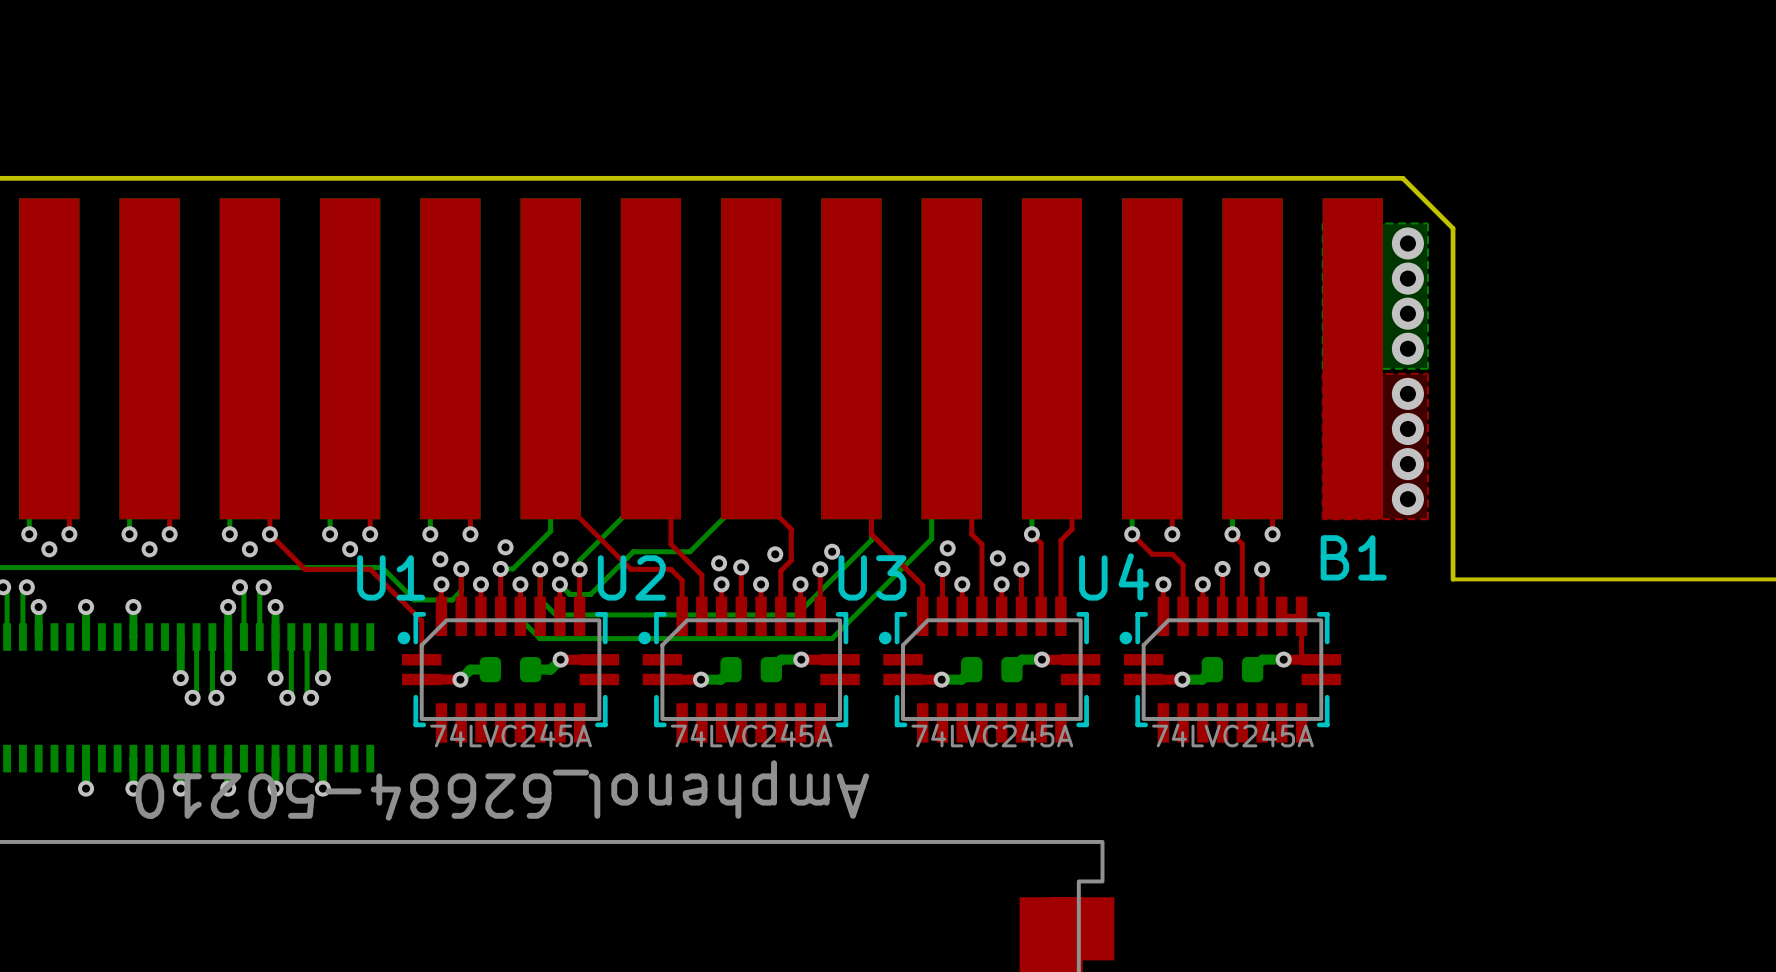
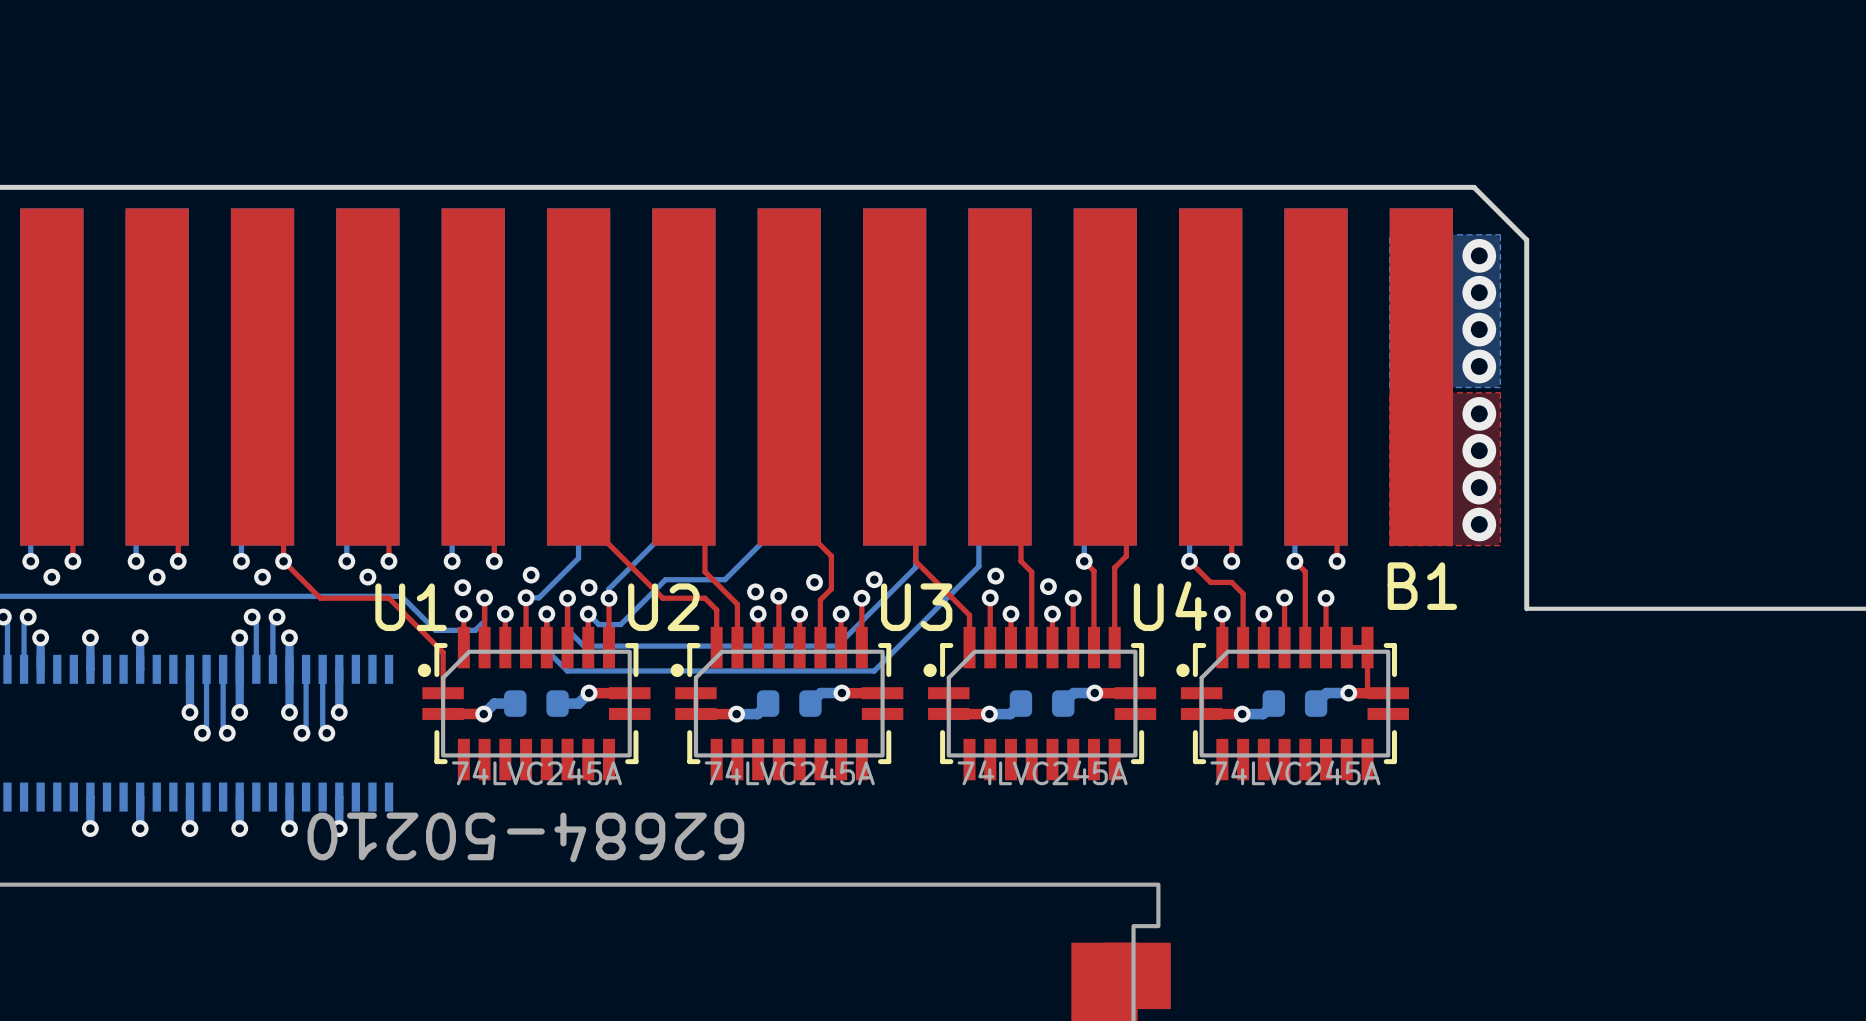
part value: Amphenol_62684-50210 (502, 790) -> 62684-50210 (525, 837)

